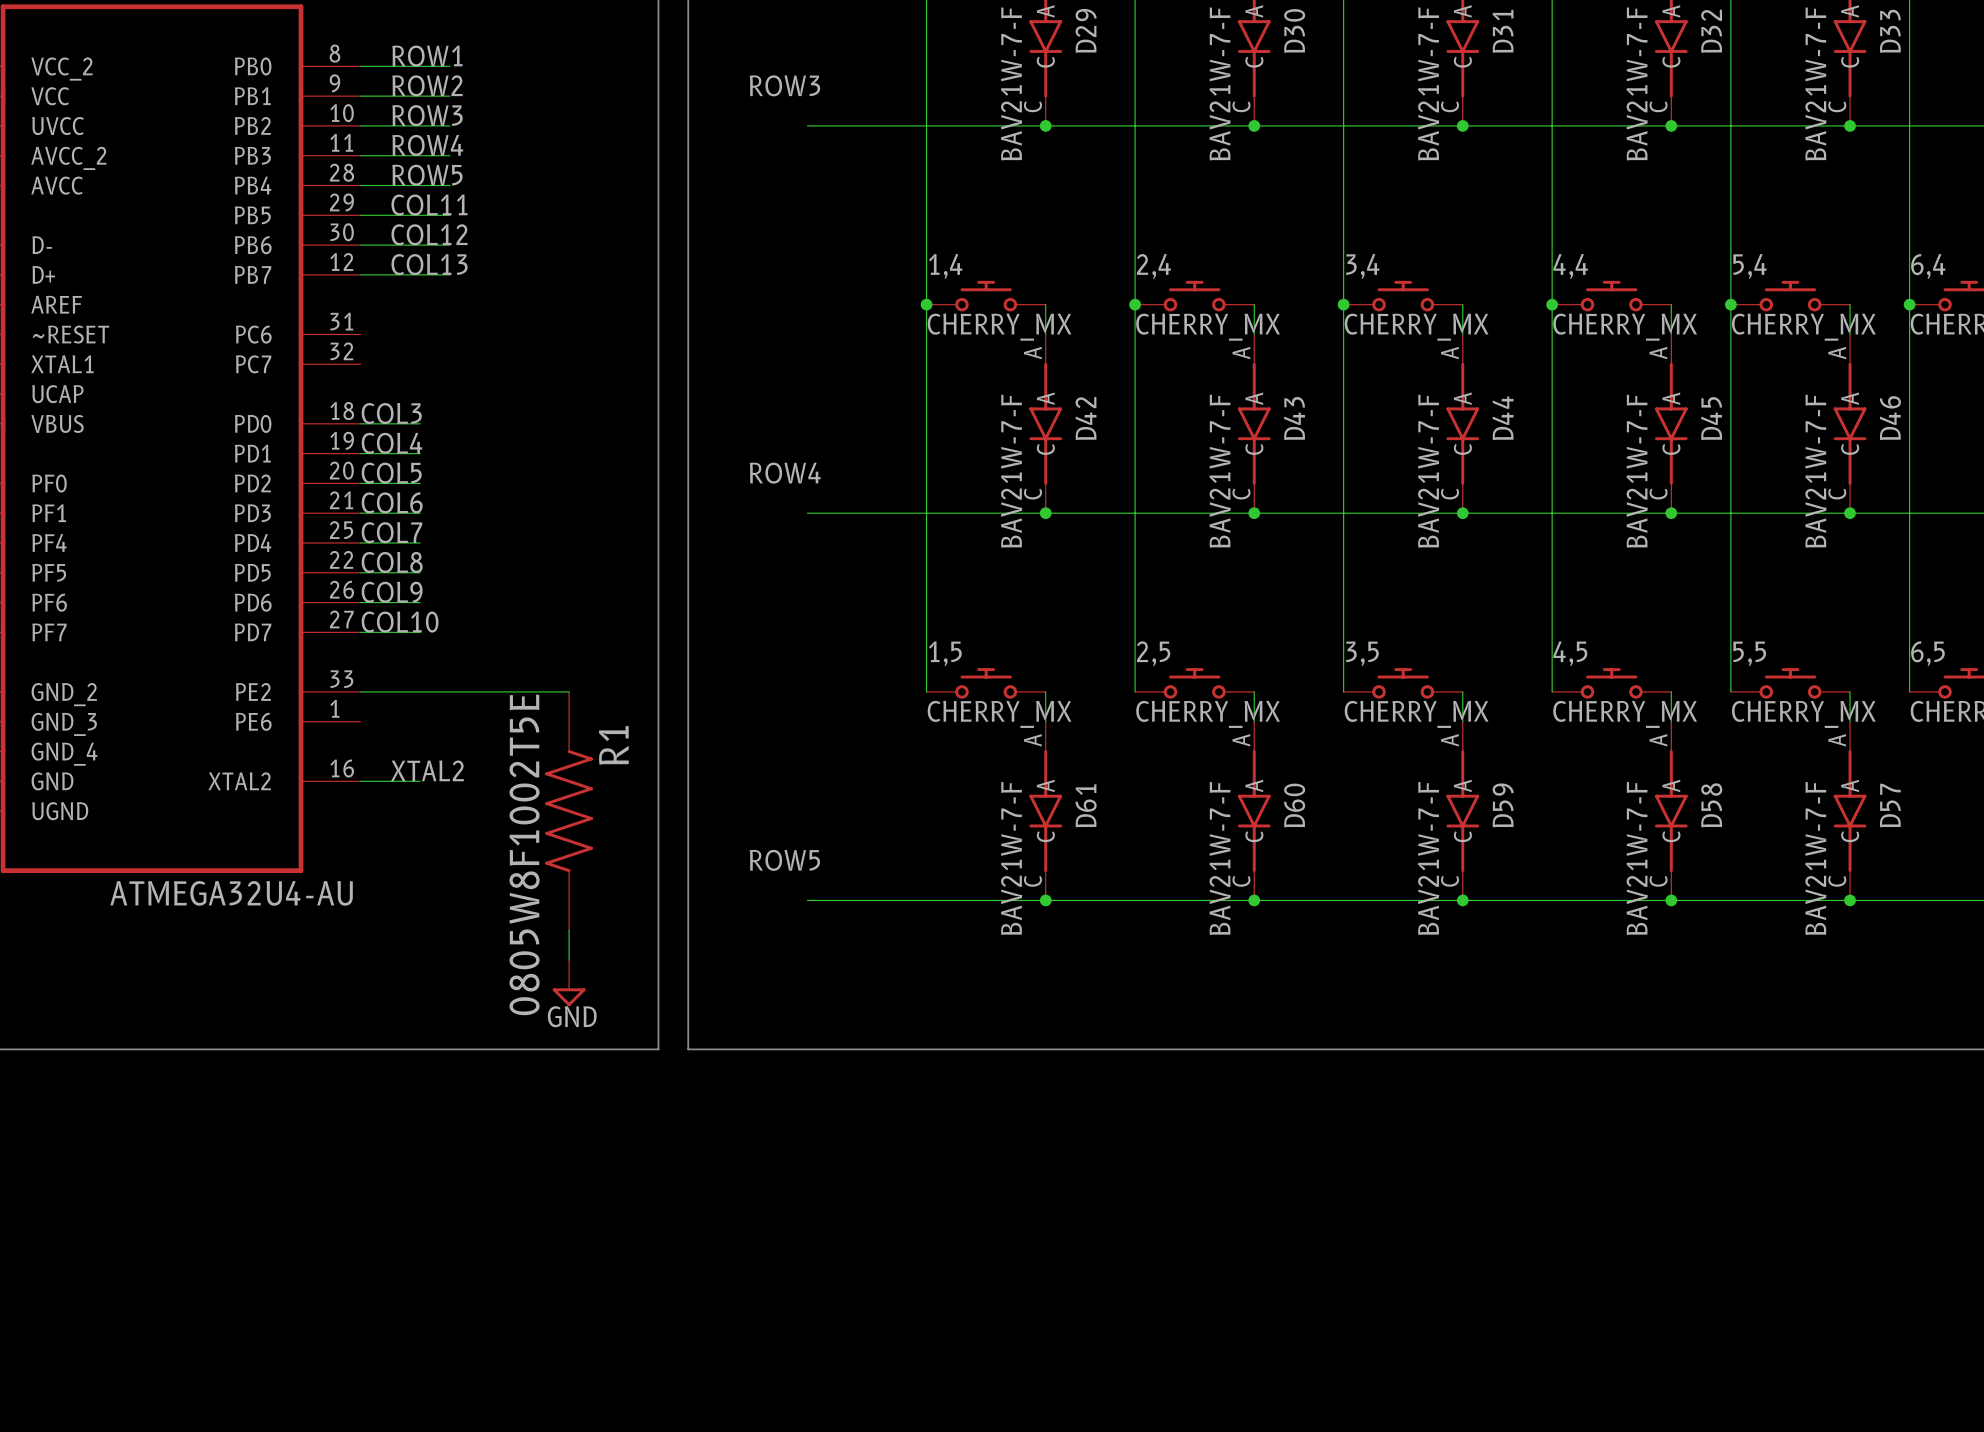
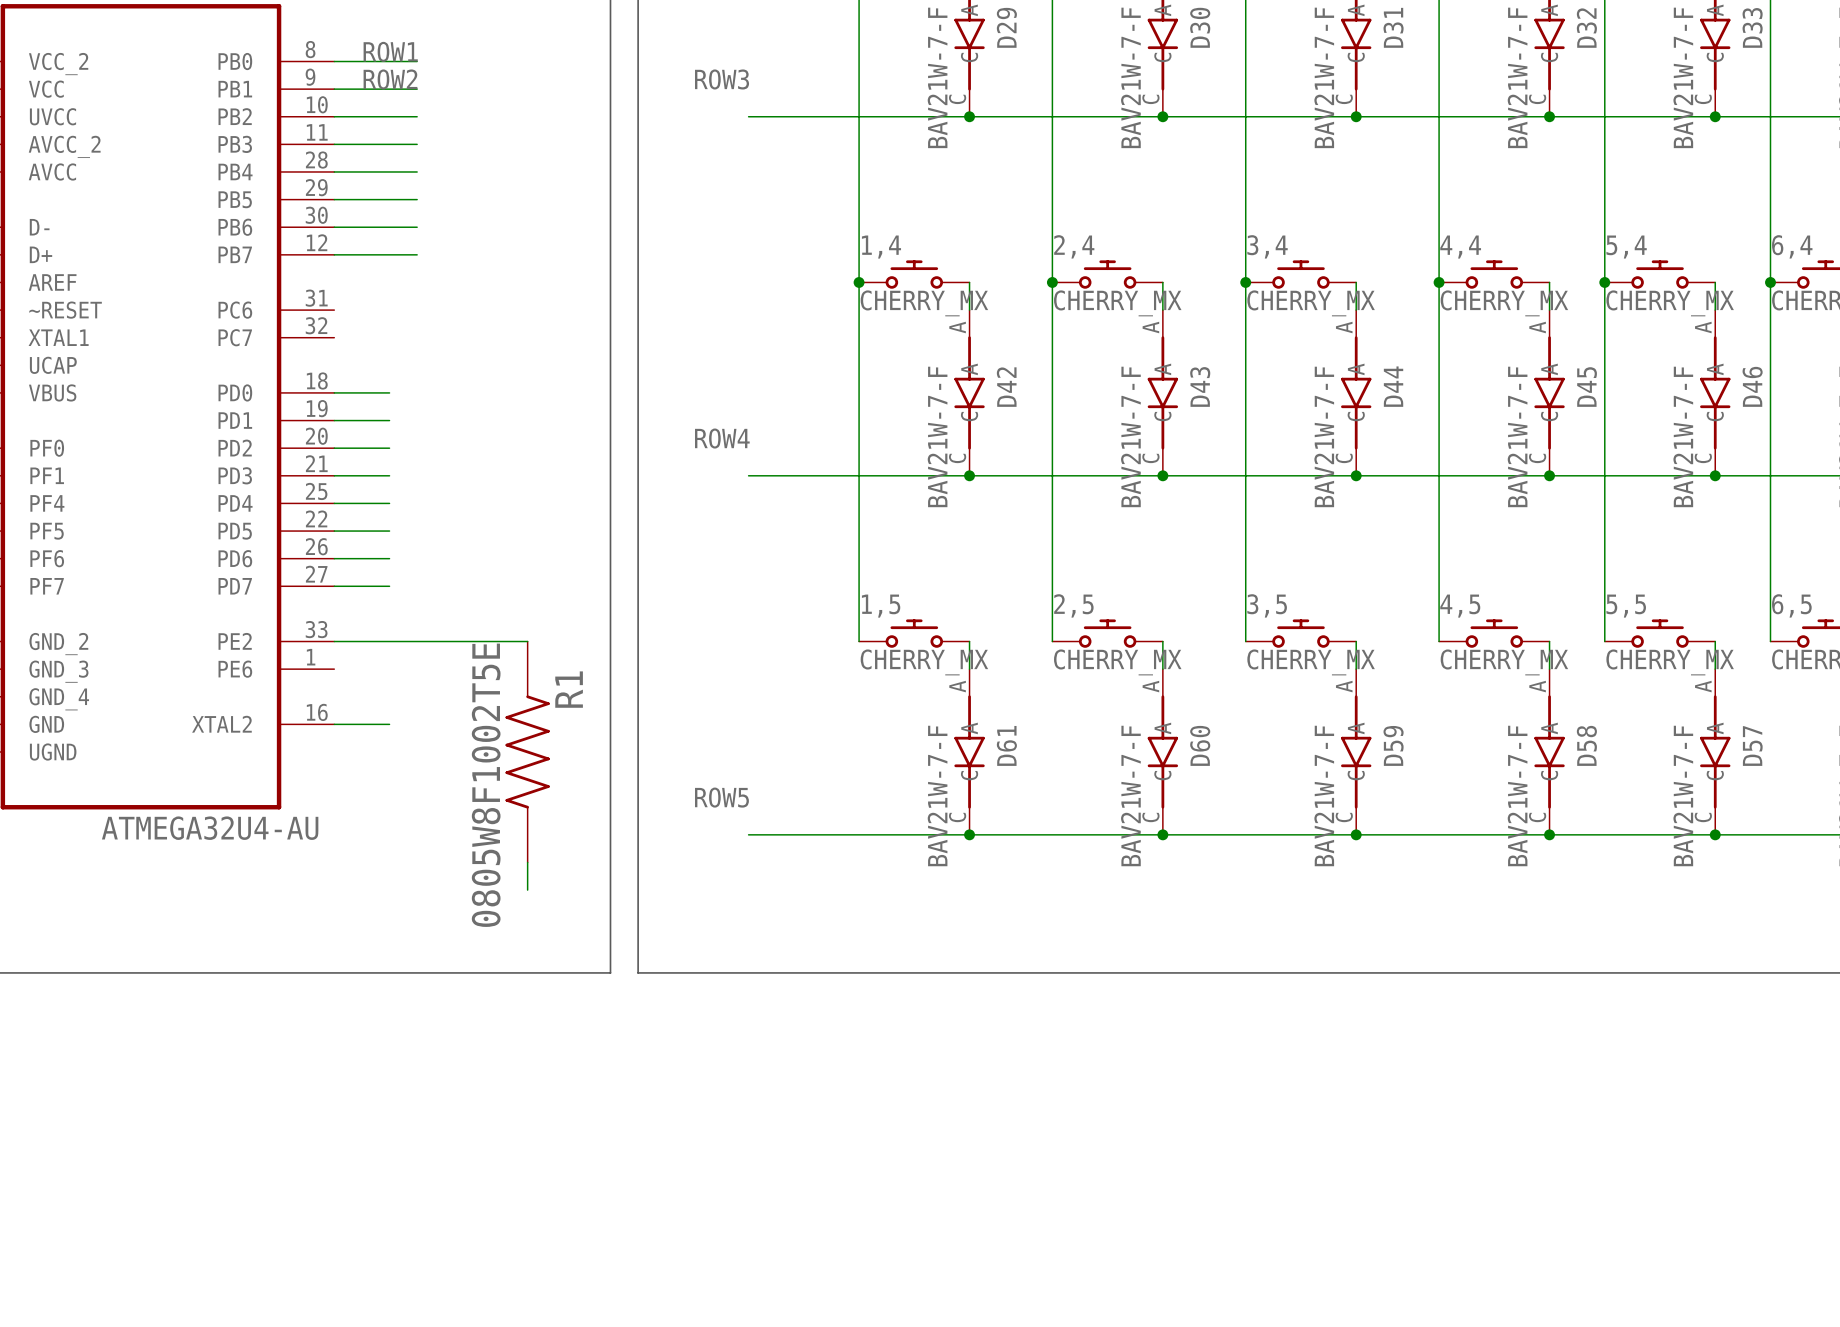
label: ROW3 (427, 115) -> none
label: ROW4 (427, 145) -> none
label: ROW5 (427, 175) -> none
label: COL11 (429, 204) -> none
label: COL12 (429, 234) -> none
label: COL13 (429, 264) -> none
label: COL3 (391, 413) -> none
label: COL4 (391, 443) -> none
label: COL5 (391, 473) -> none
label: COL6 (392, 502) -> none
label: COL7 (391, 532) -> none
label: COL8 (392, 562) -> none
label: COL9 (392, 592) -> none
label: COL10 (400, 622) -> none
label: XTAL2 (427, 770) -> none
power symbol: GND (569, 983) -> none

